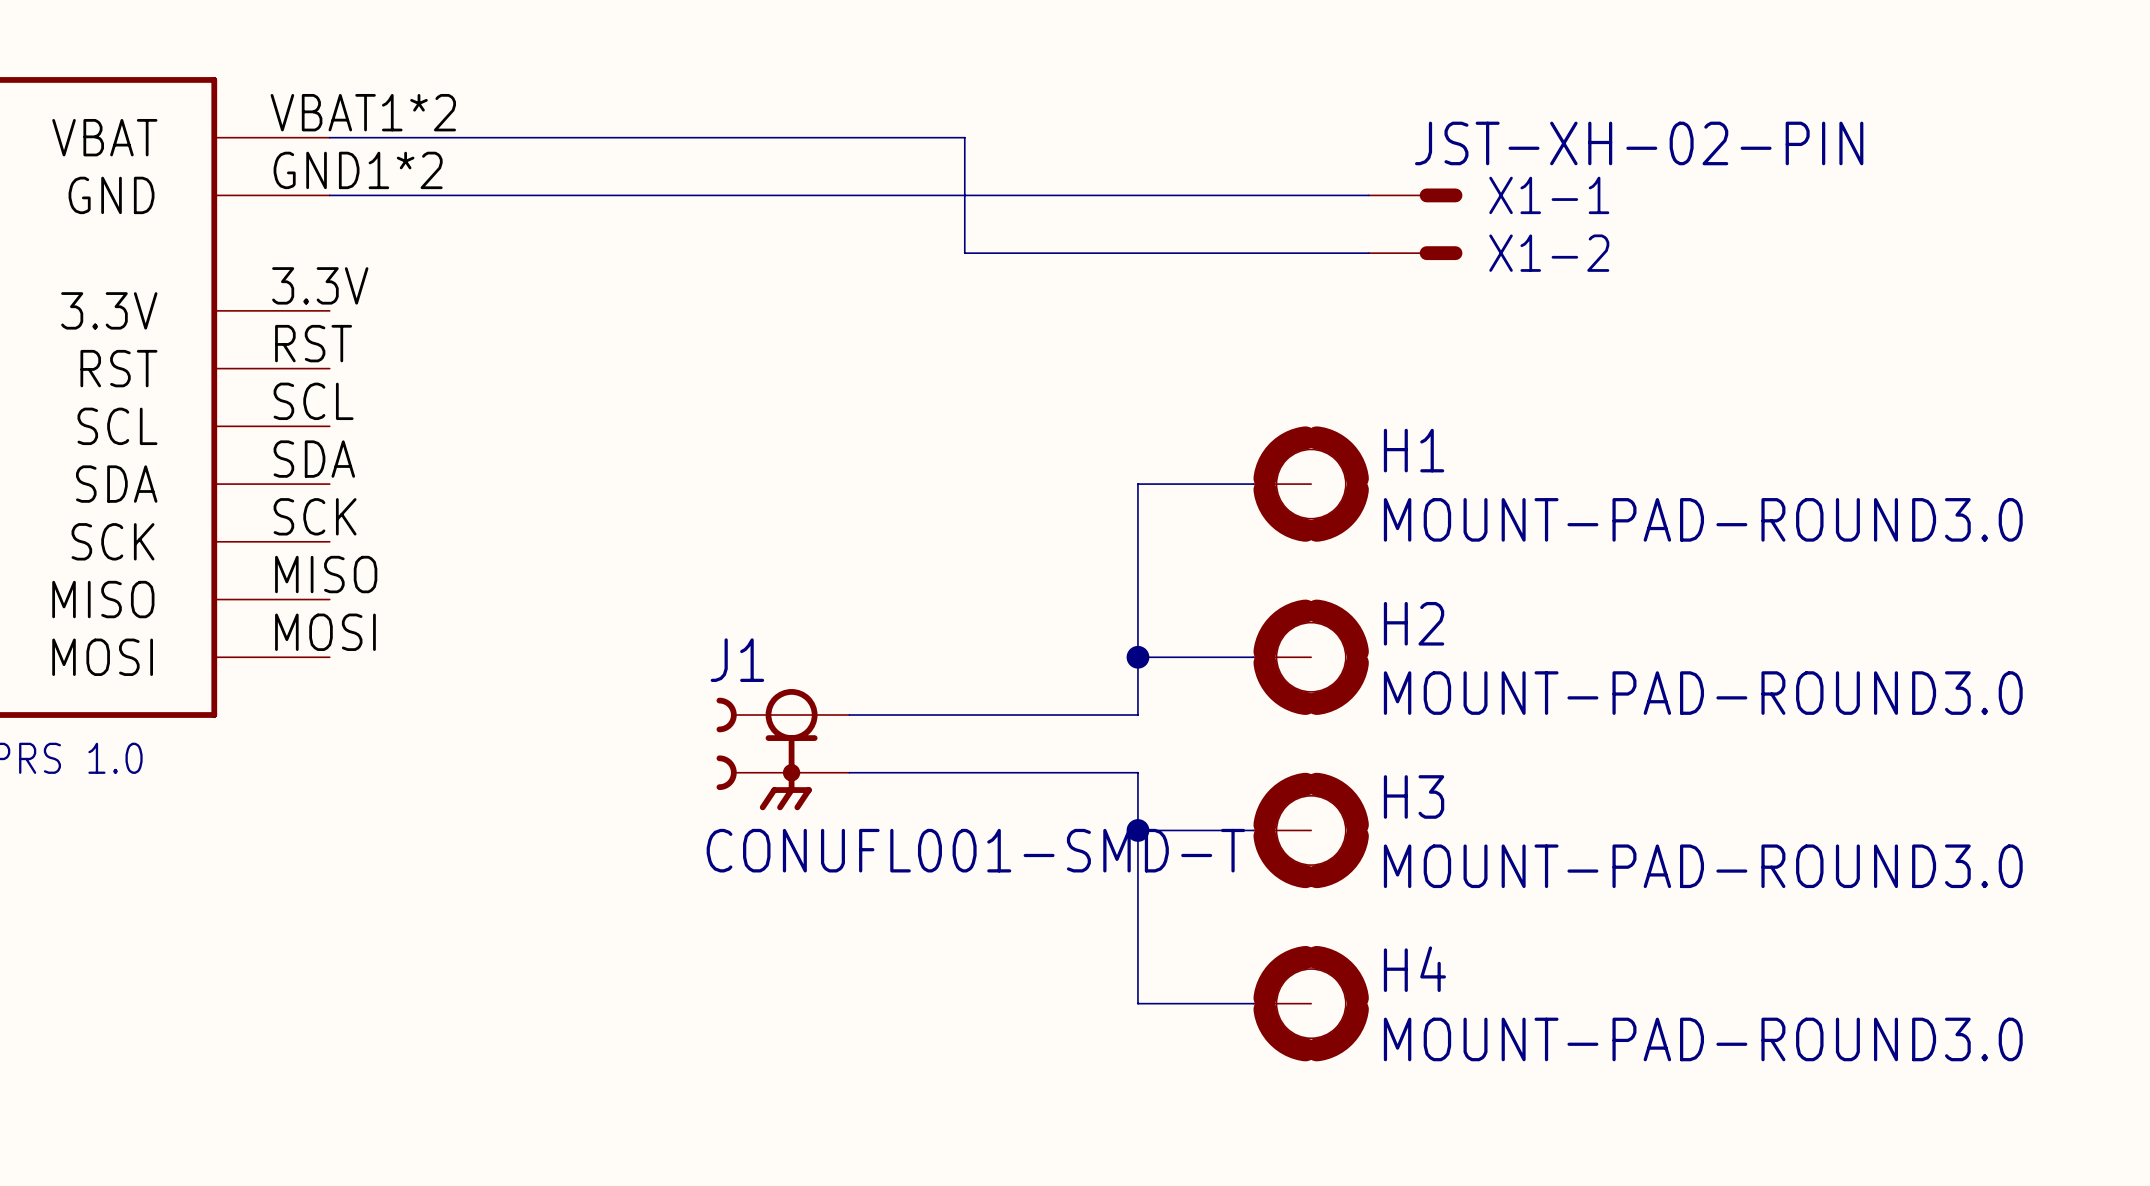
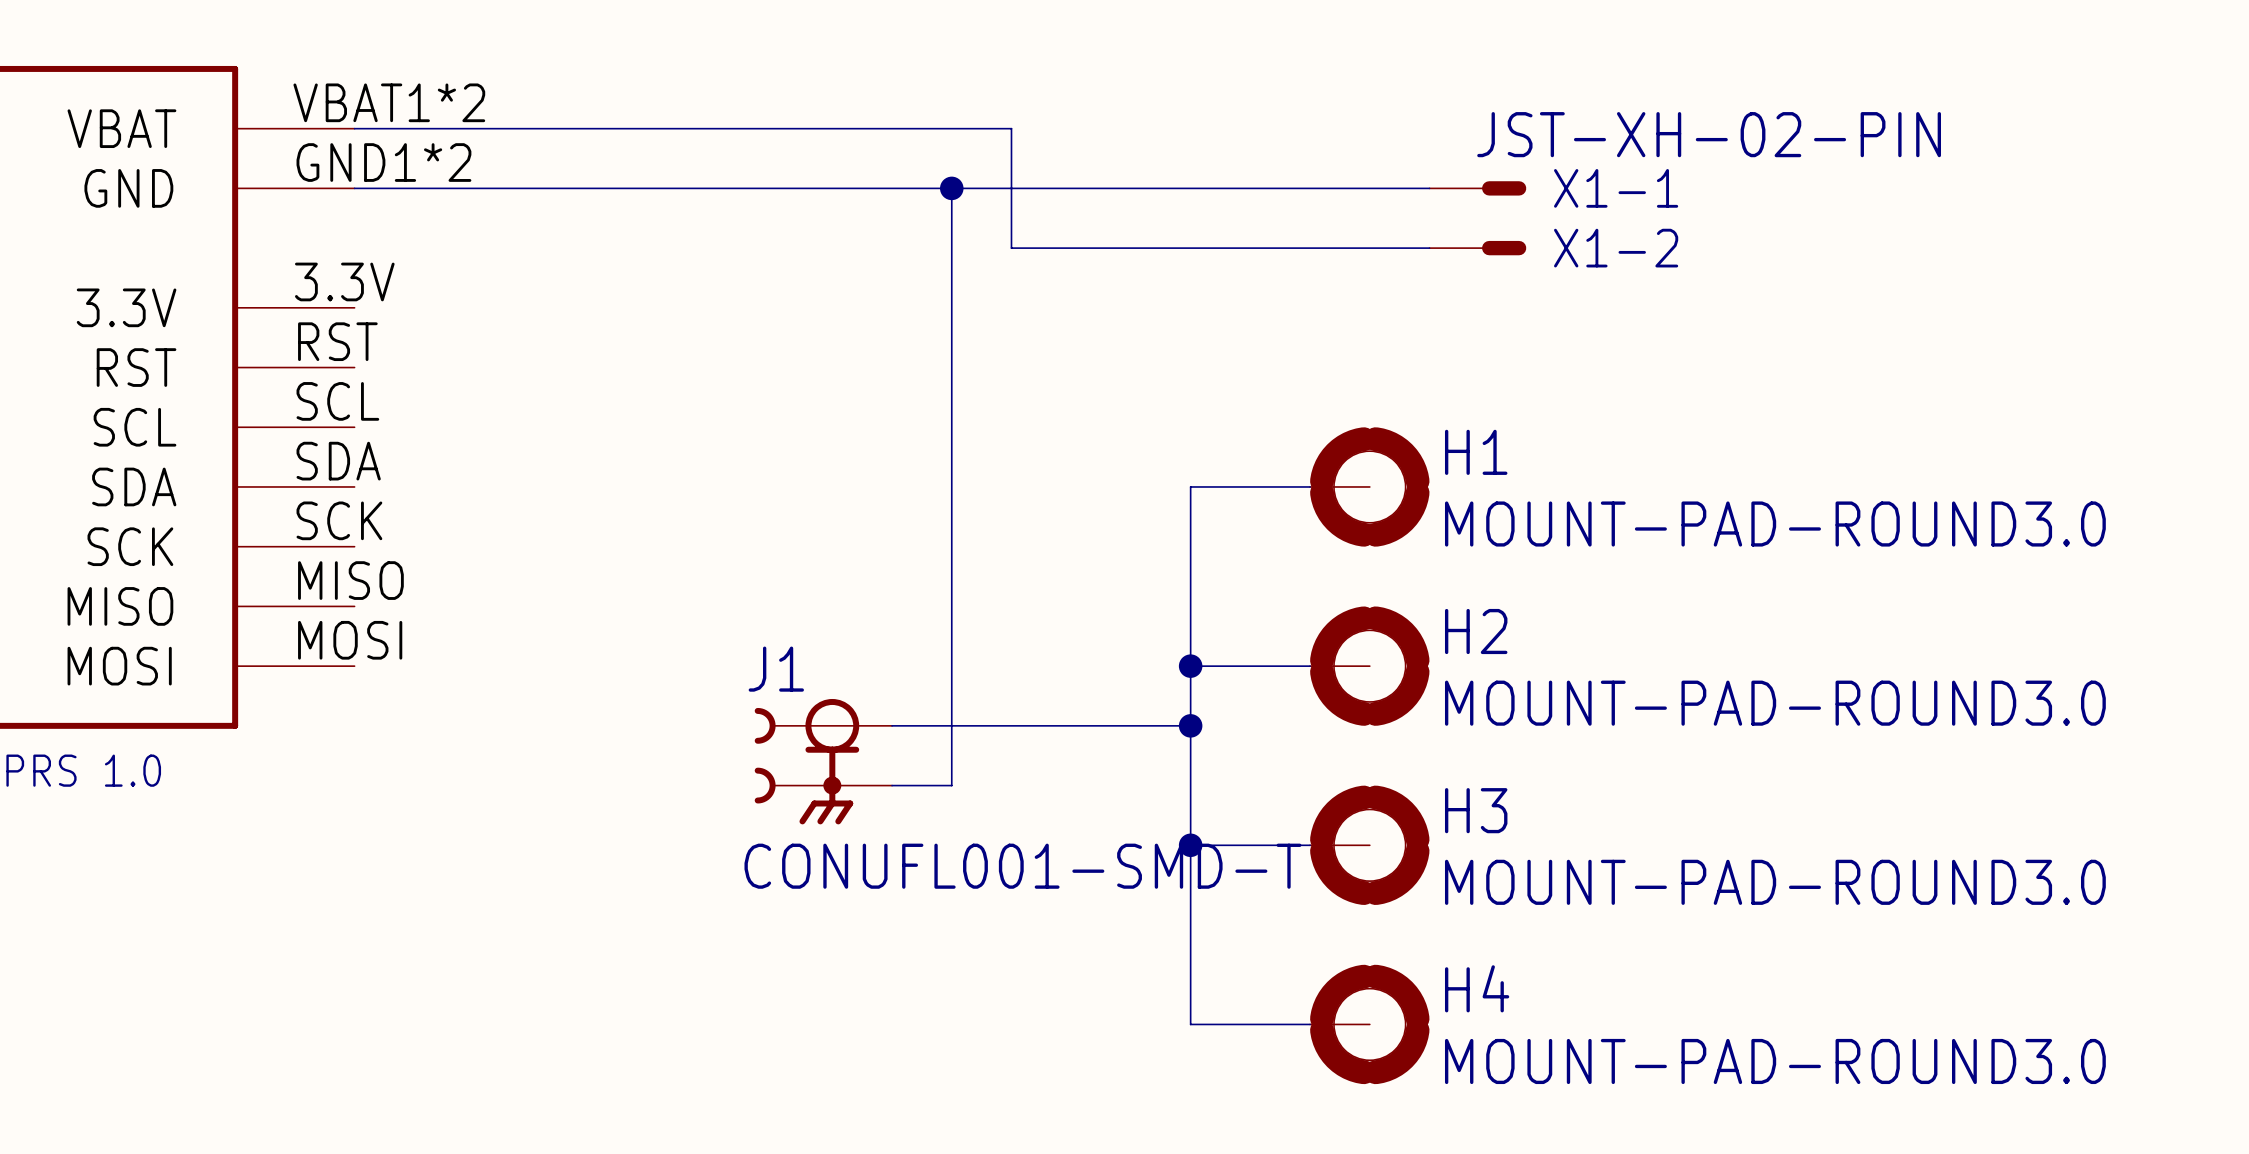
wire: none -> (951, 188) (951, 785)
junction: none -> (951, 188)
junction: none -> (1190, 725)
wire: (907, 772) (1137, 772) -> (1190, 725) (1190, 785)

